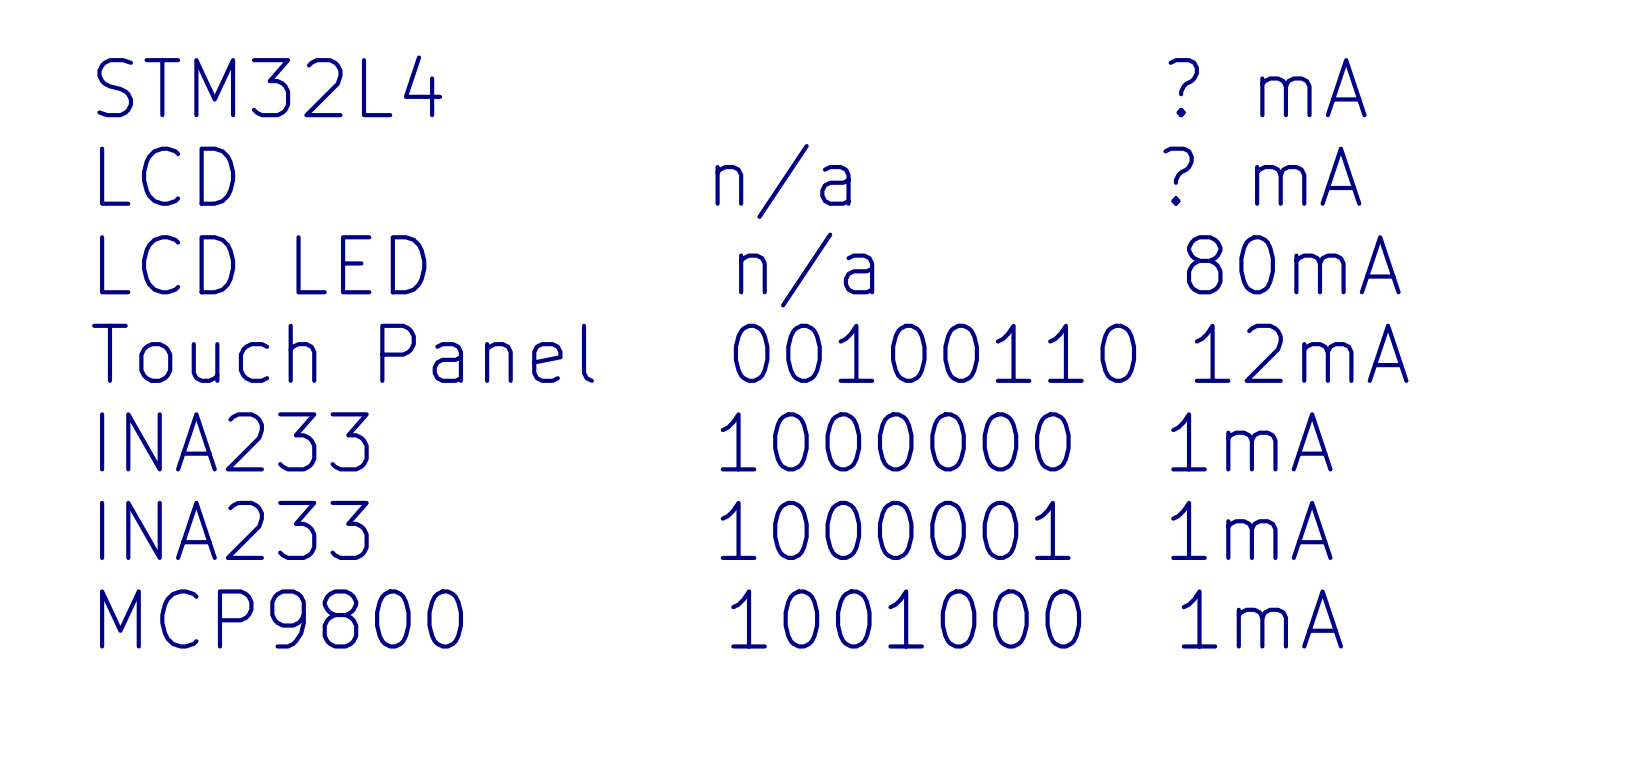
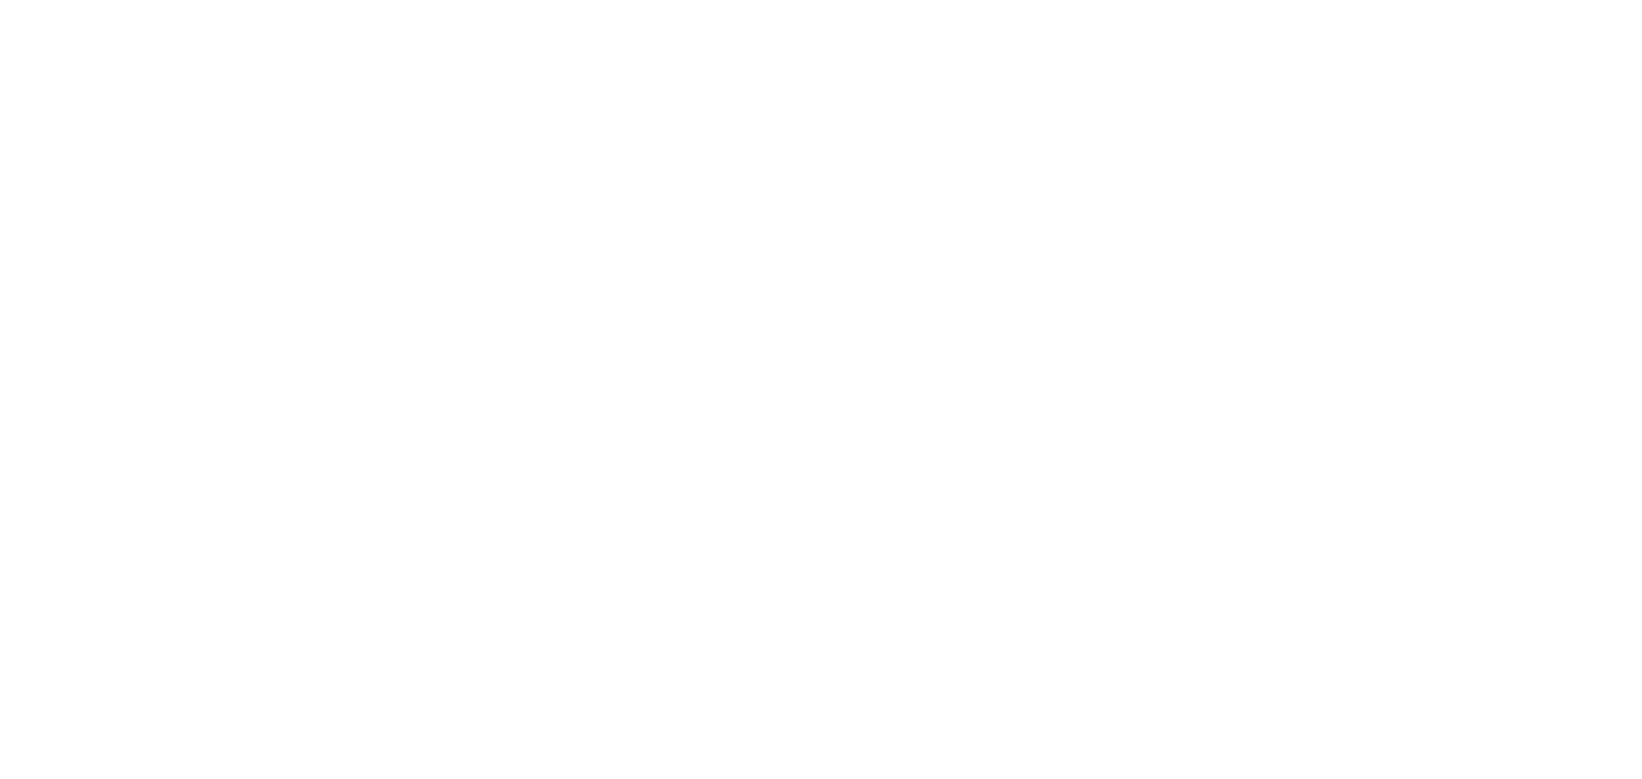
text: STM32L4 ? mA (732, 86) -> none
text: LCD n/a ? mA (730, 181) -> none
text: LCD LED n/a 80mA (750, 270) -> none
text: Touch Panel 00100110 12mA (750, 353) -> none
text: INA233 1000000 1mA (716, 441) -> none
text: INA233 1000001 1mA (716, 530) -> none
text: MCP9800 1001000 1mA (721, 618) -> none

